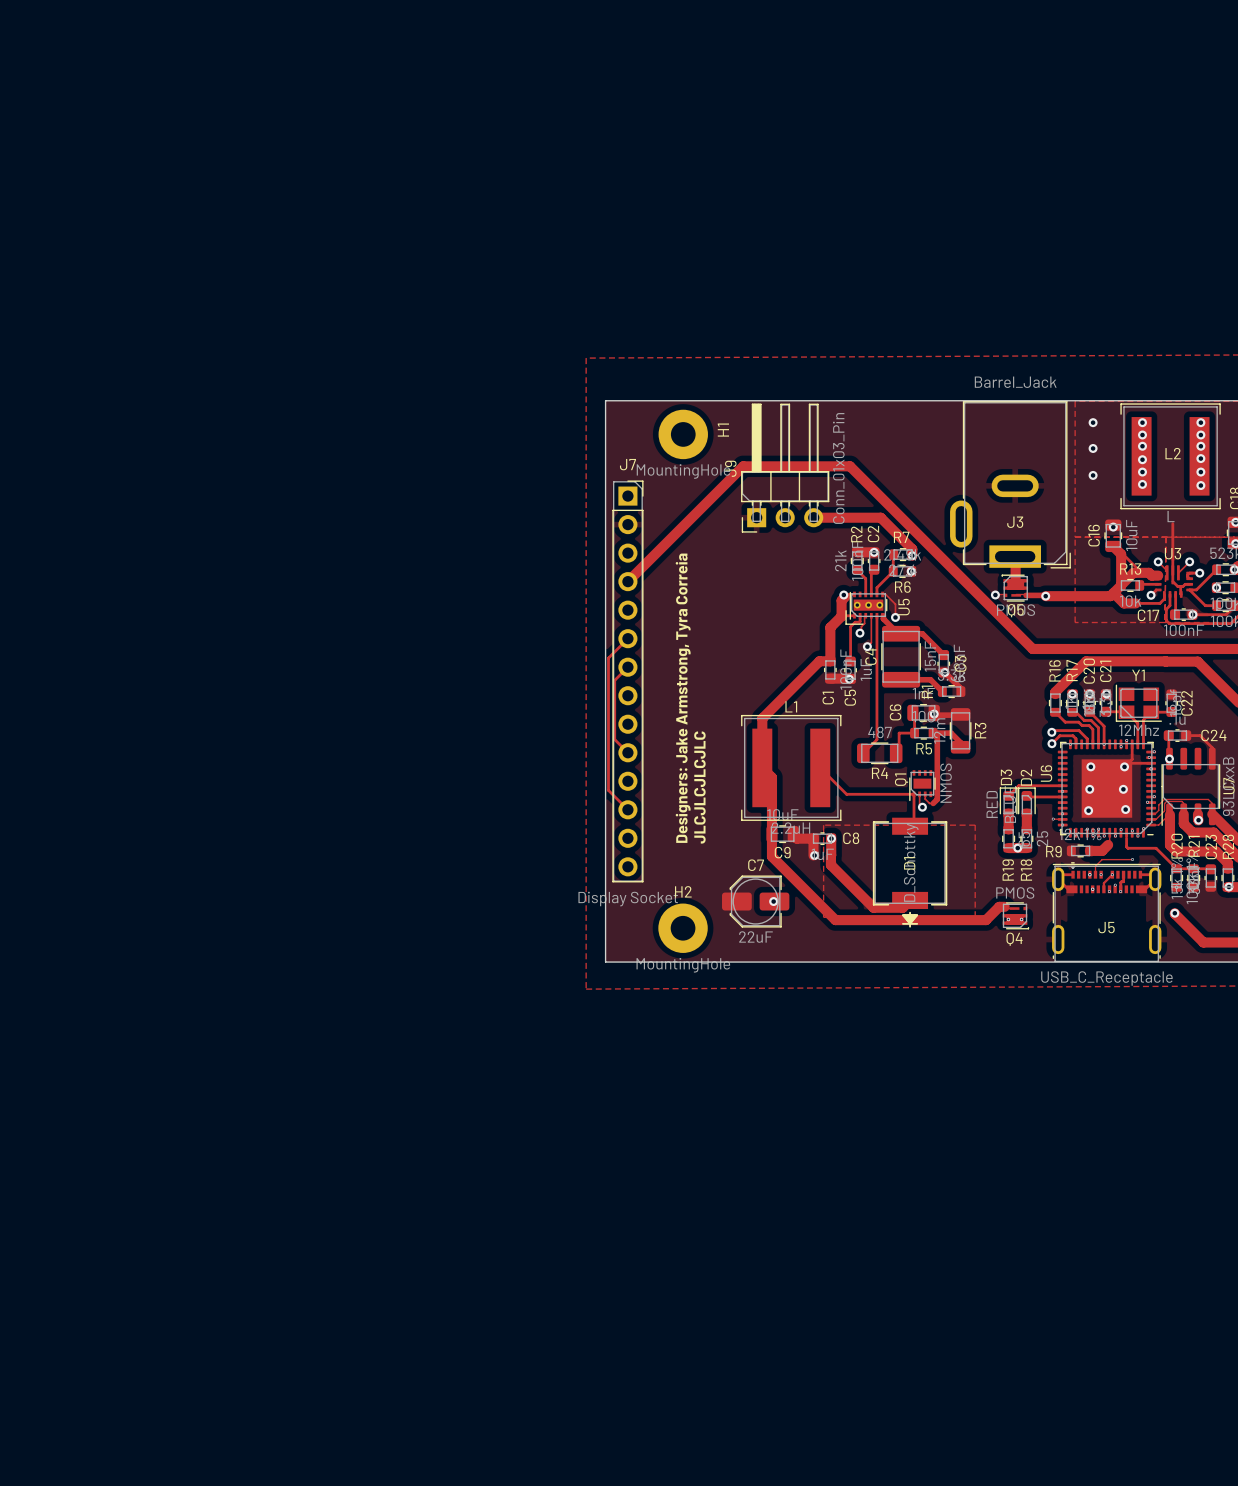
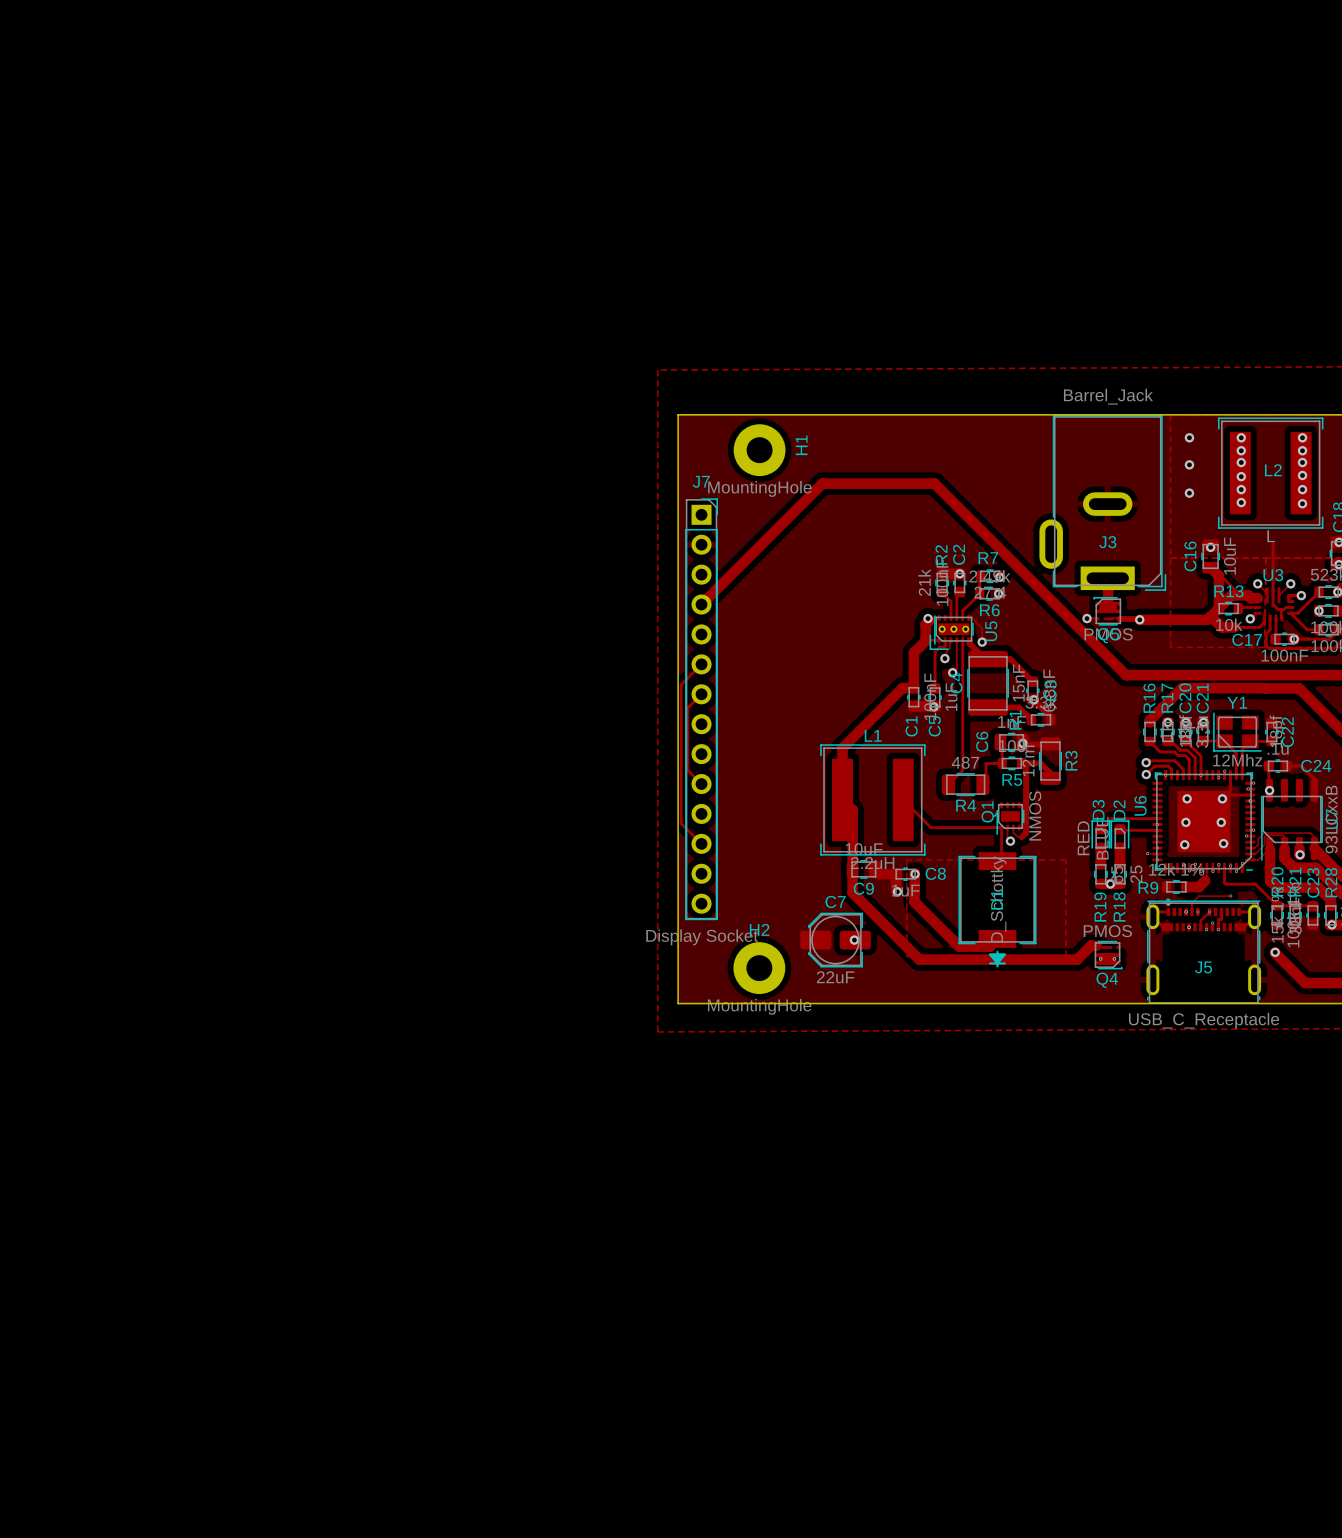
J9: Conn_01x03_Pin (785, 468) -> none
track: (813, 517) (880, 517) (912, 549) (912, 555) -> none
text: Designers: Jake Armstrong, Tyra Correia (683, 698) -> none
text: JLCJLCJLCJLC (699, 787) -> none

